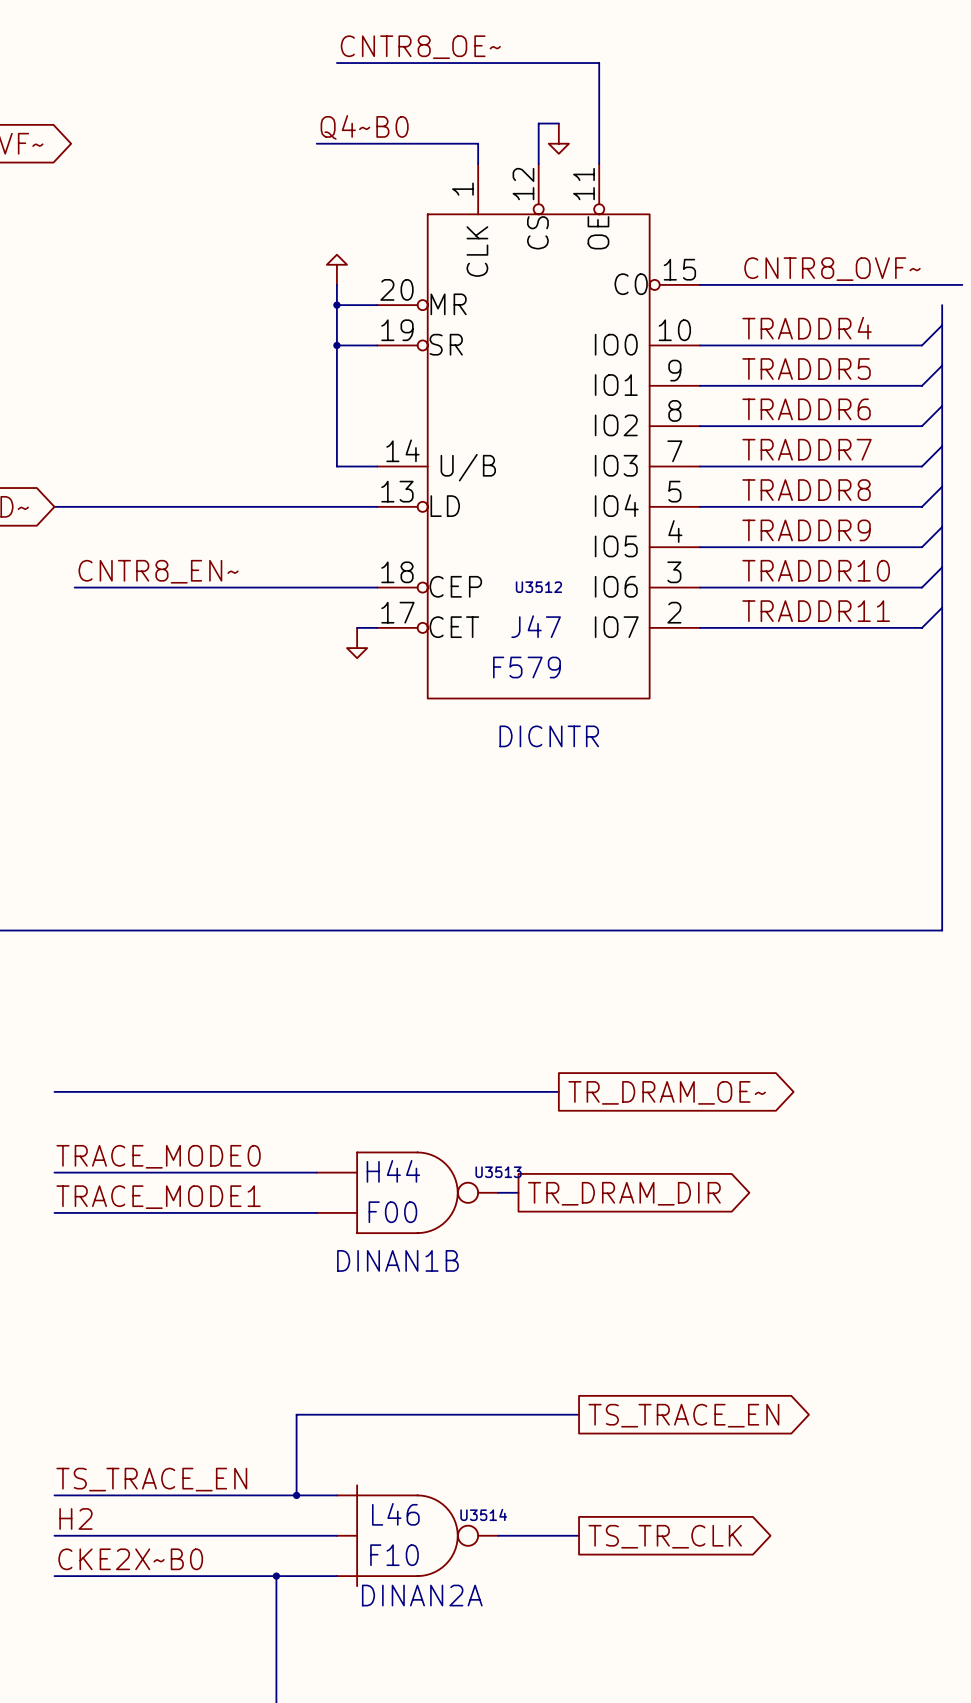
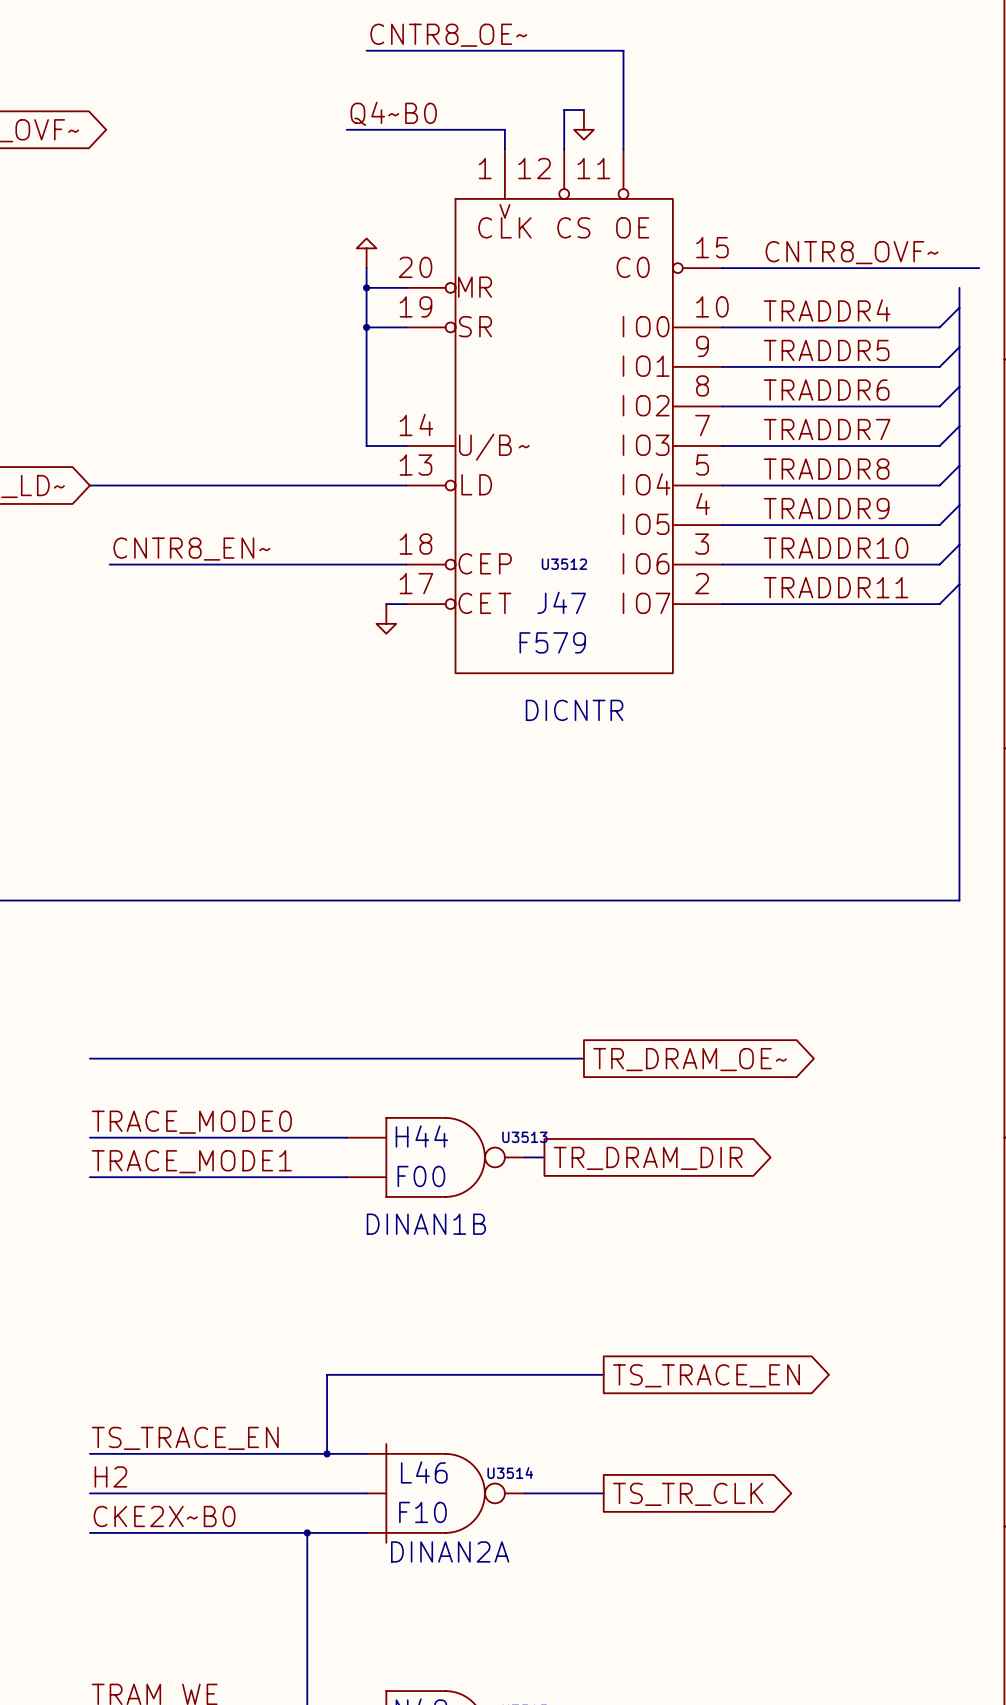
U3512 symbol: [377, 163, 701, 699] -> [406, 149, 723, 674]

